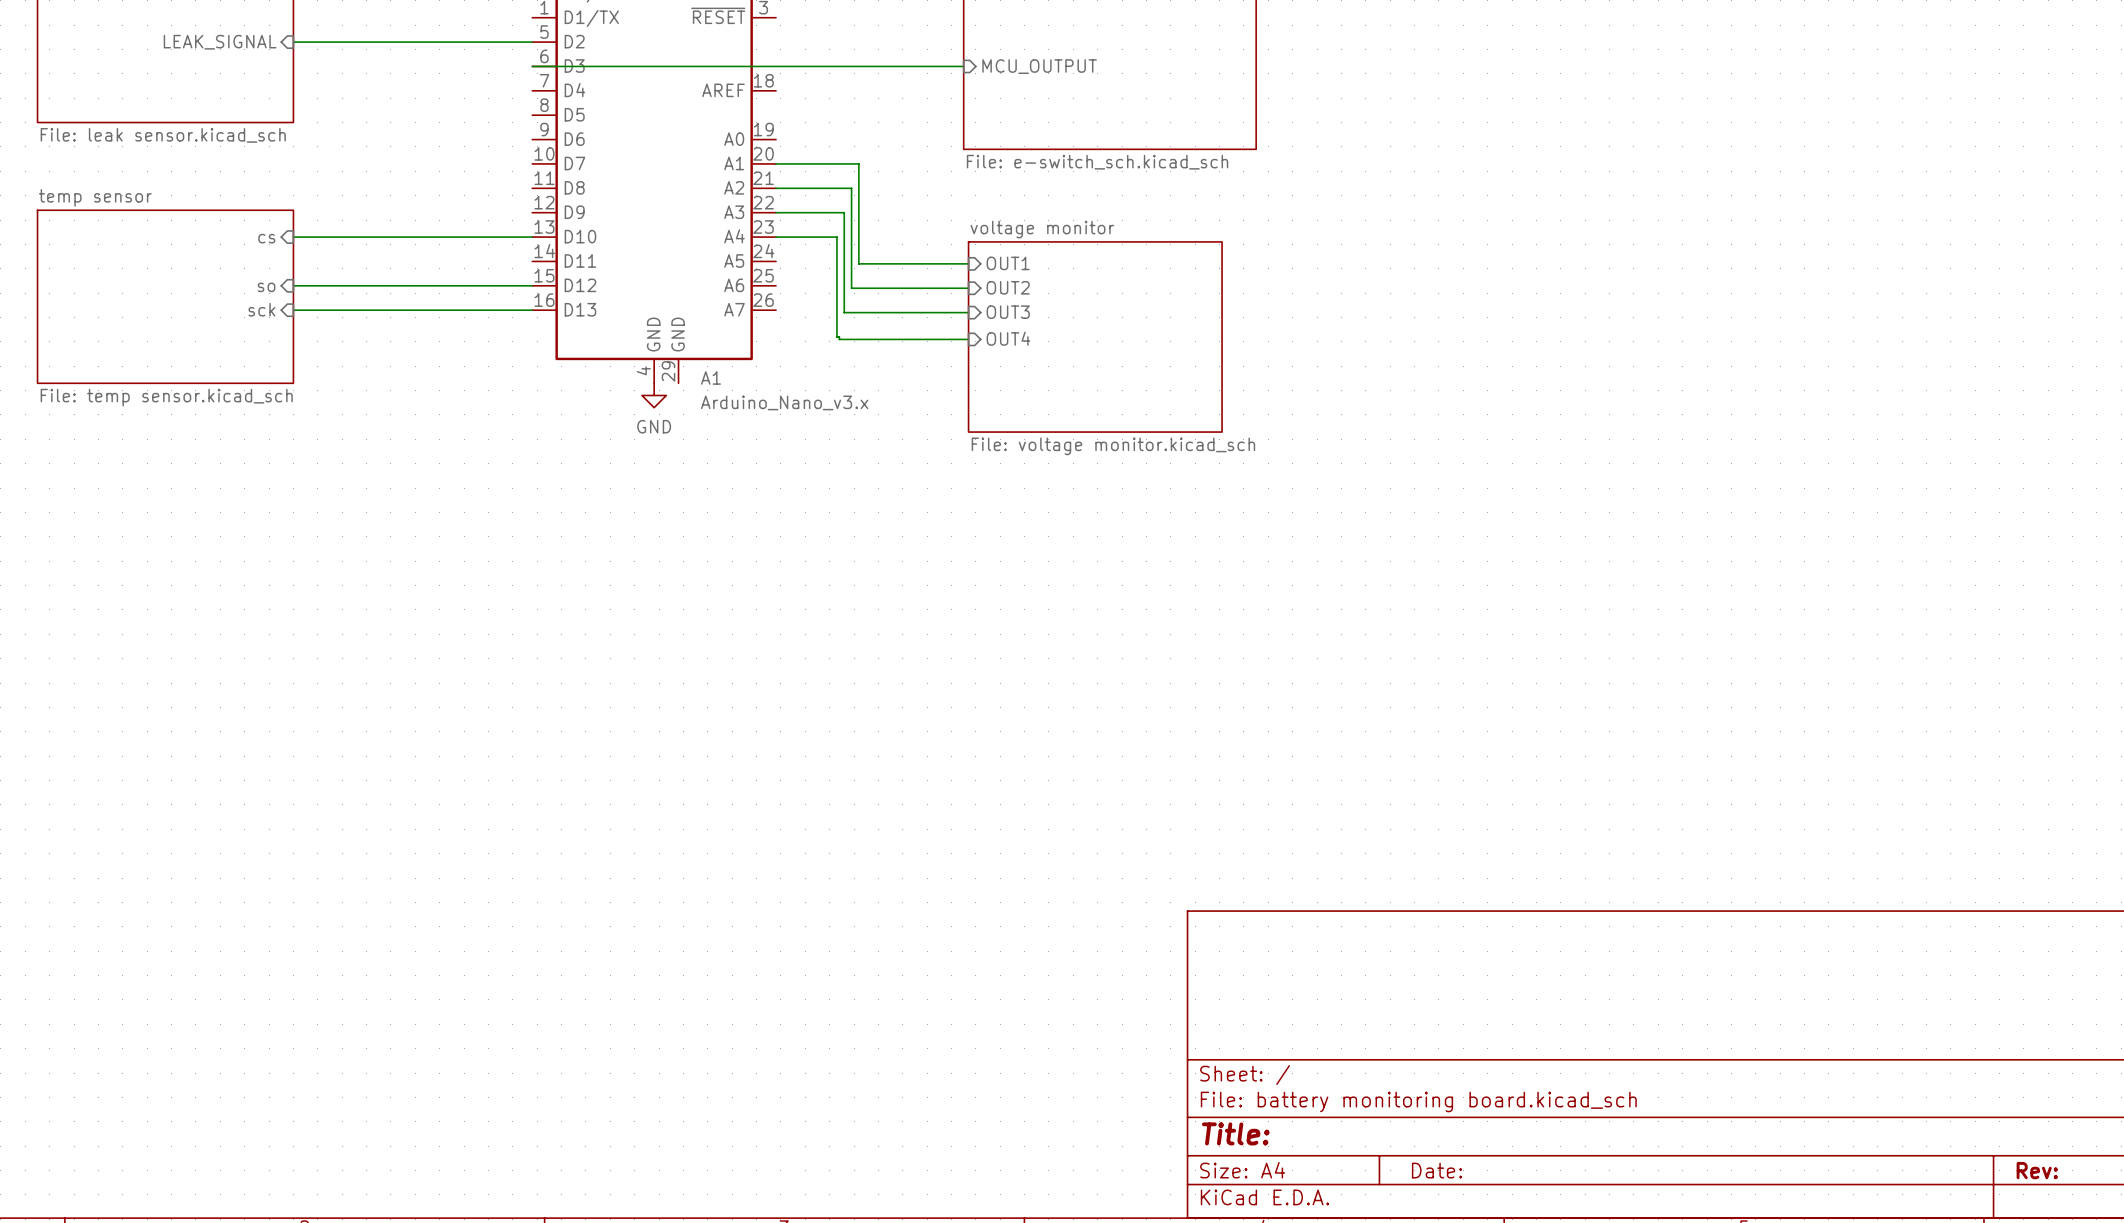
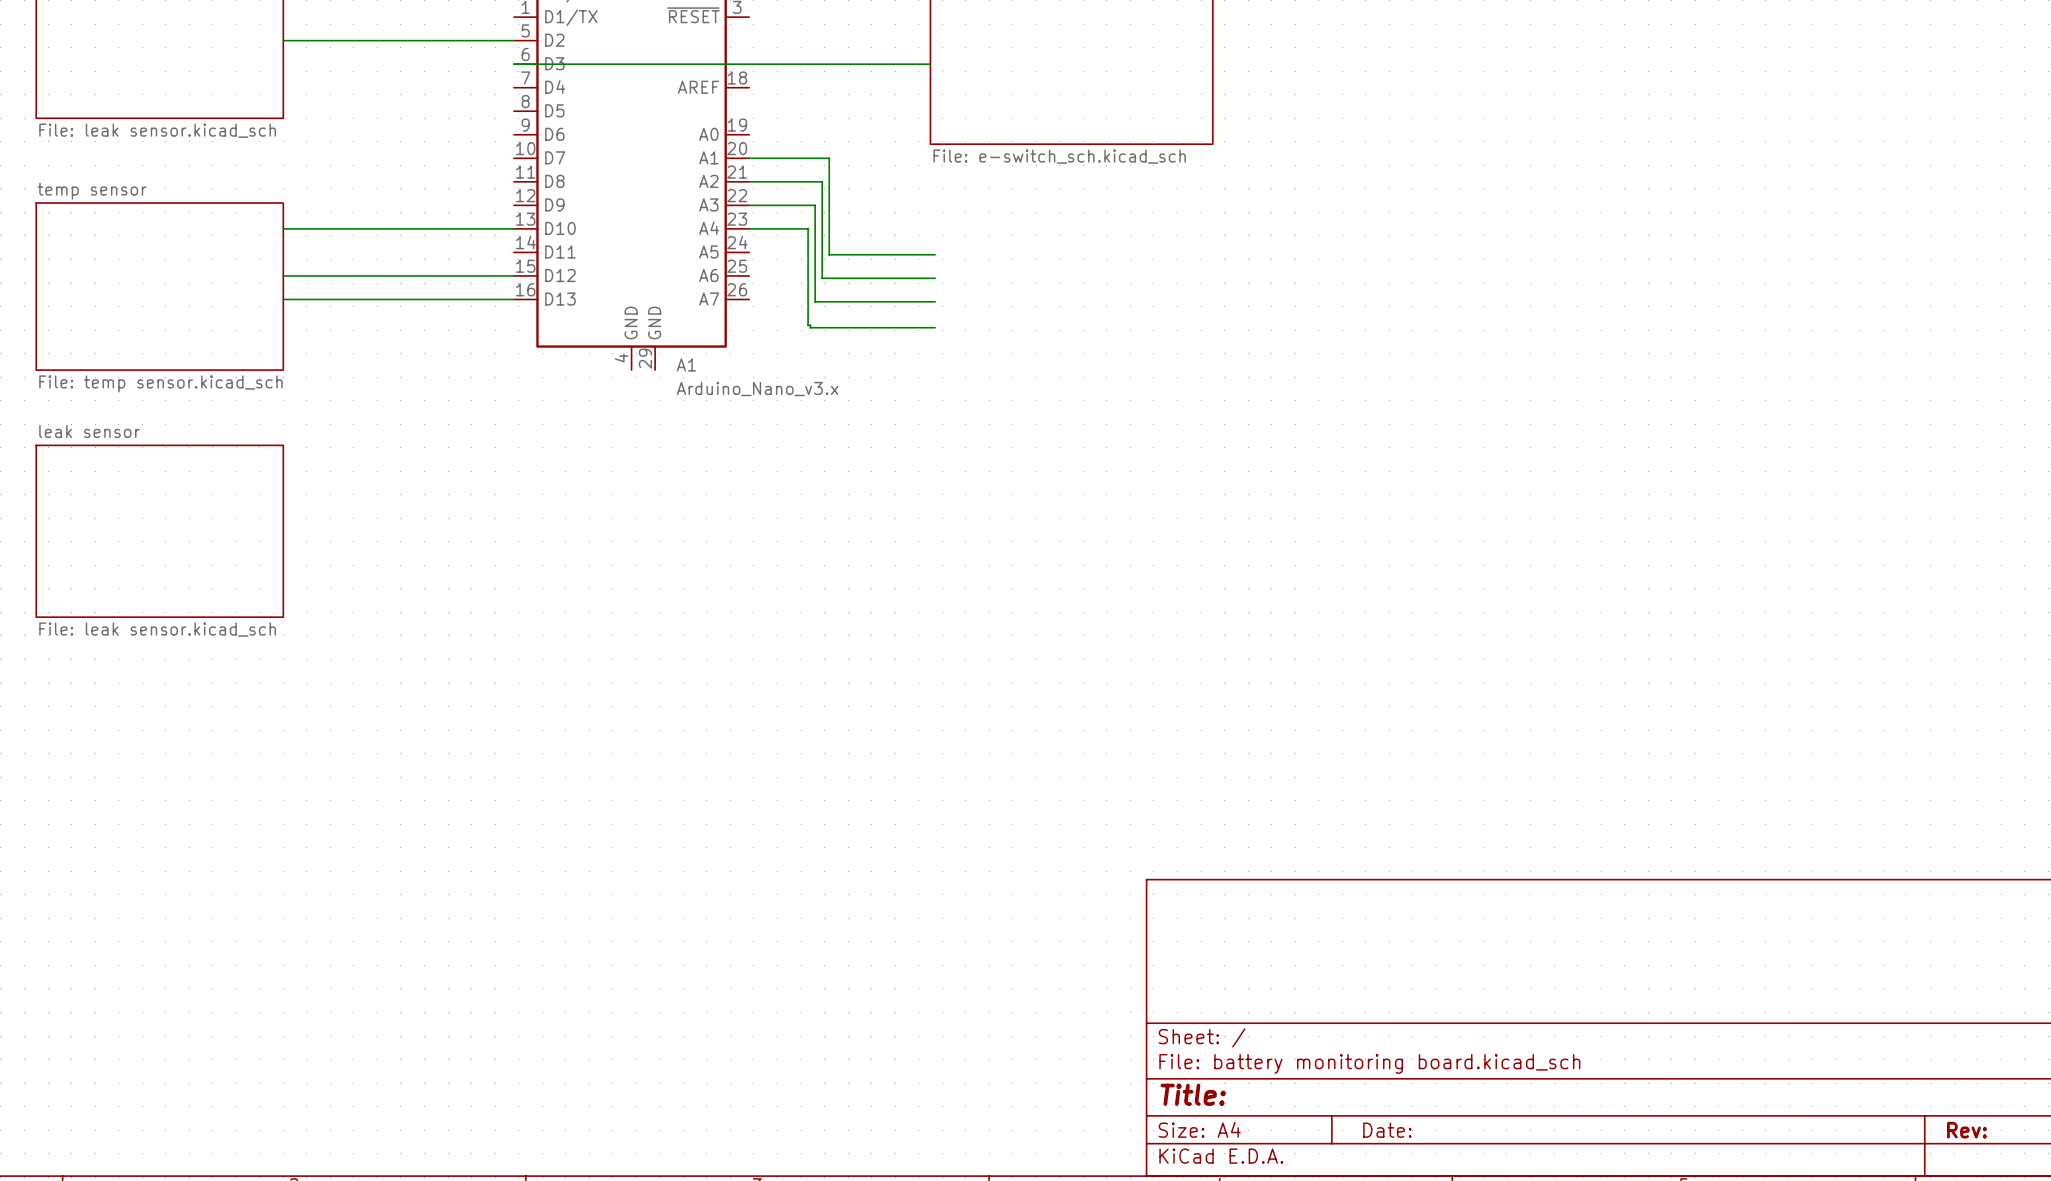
sheet pin: LEAK_SIGNAL (220, 42) -> none
sheet pin: MCU_OUTPUT (1039, 66) -> none
sheet pin: cs (266, 238) -> none
sheet pin: OUT1 (1008, 263) -> none
sheet pin: so (266, 287) -> none
sheet pin: OUT2 (1008, 287) -> none
sheet pin: sck (261, 309) -> none
sheet pin: OUT3 (1008, 312) -> none
sheet voltage monitor: File: voltage monitor.kicad_sch (1095, 336) -> none
sheet pin: OUT4 (1008, 338) -> none
power symbol: GND (654, 395) -> none
sheet leak sensor: none -> File: leak sensor.kicad_sch (159, 531)

